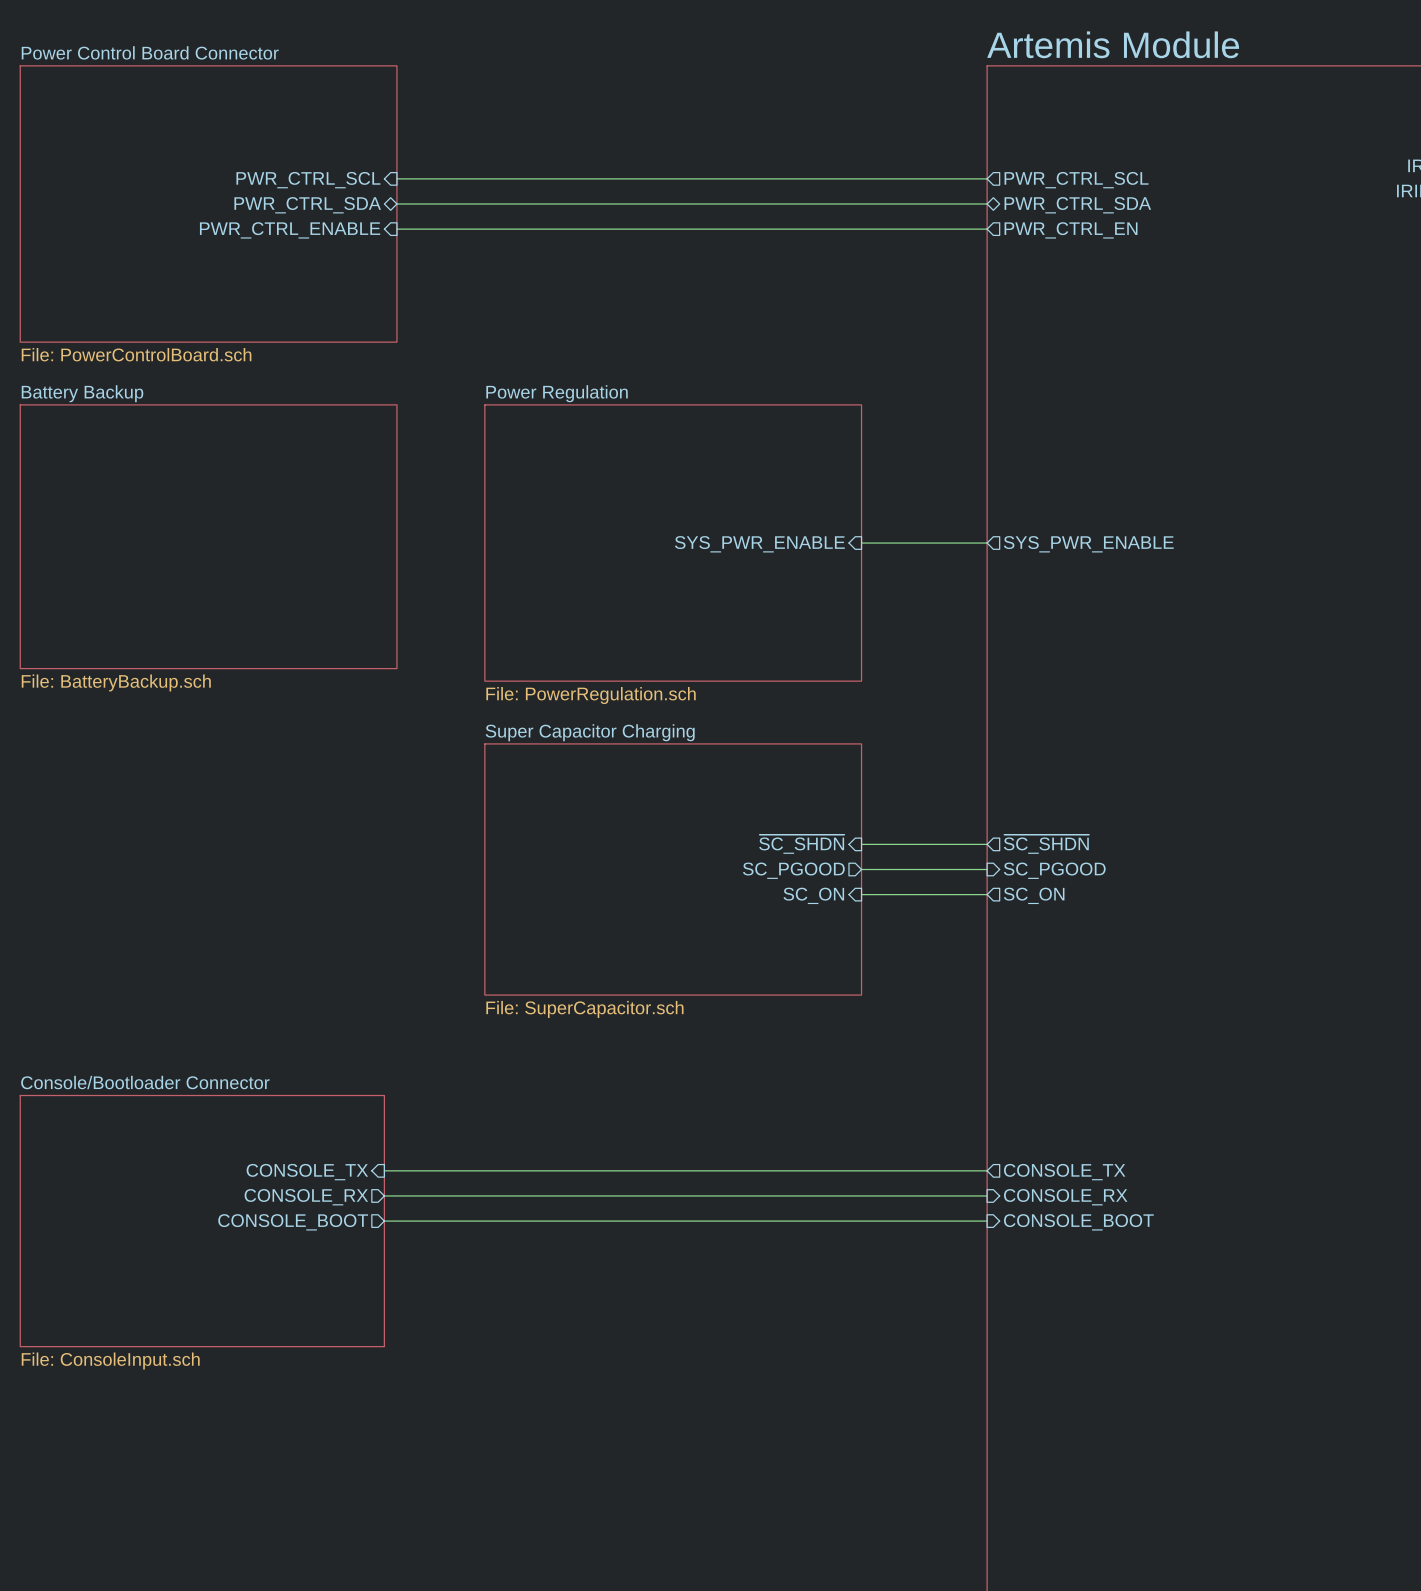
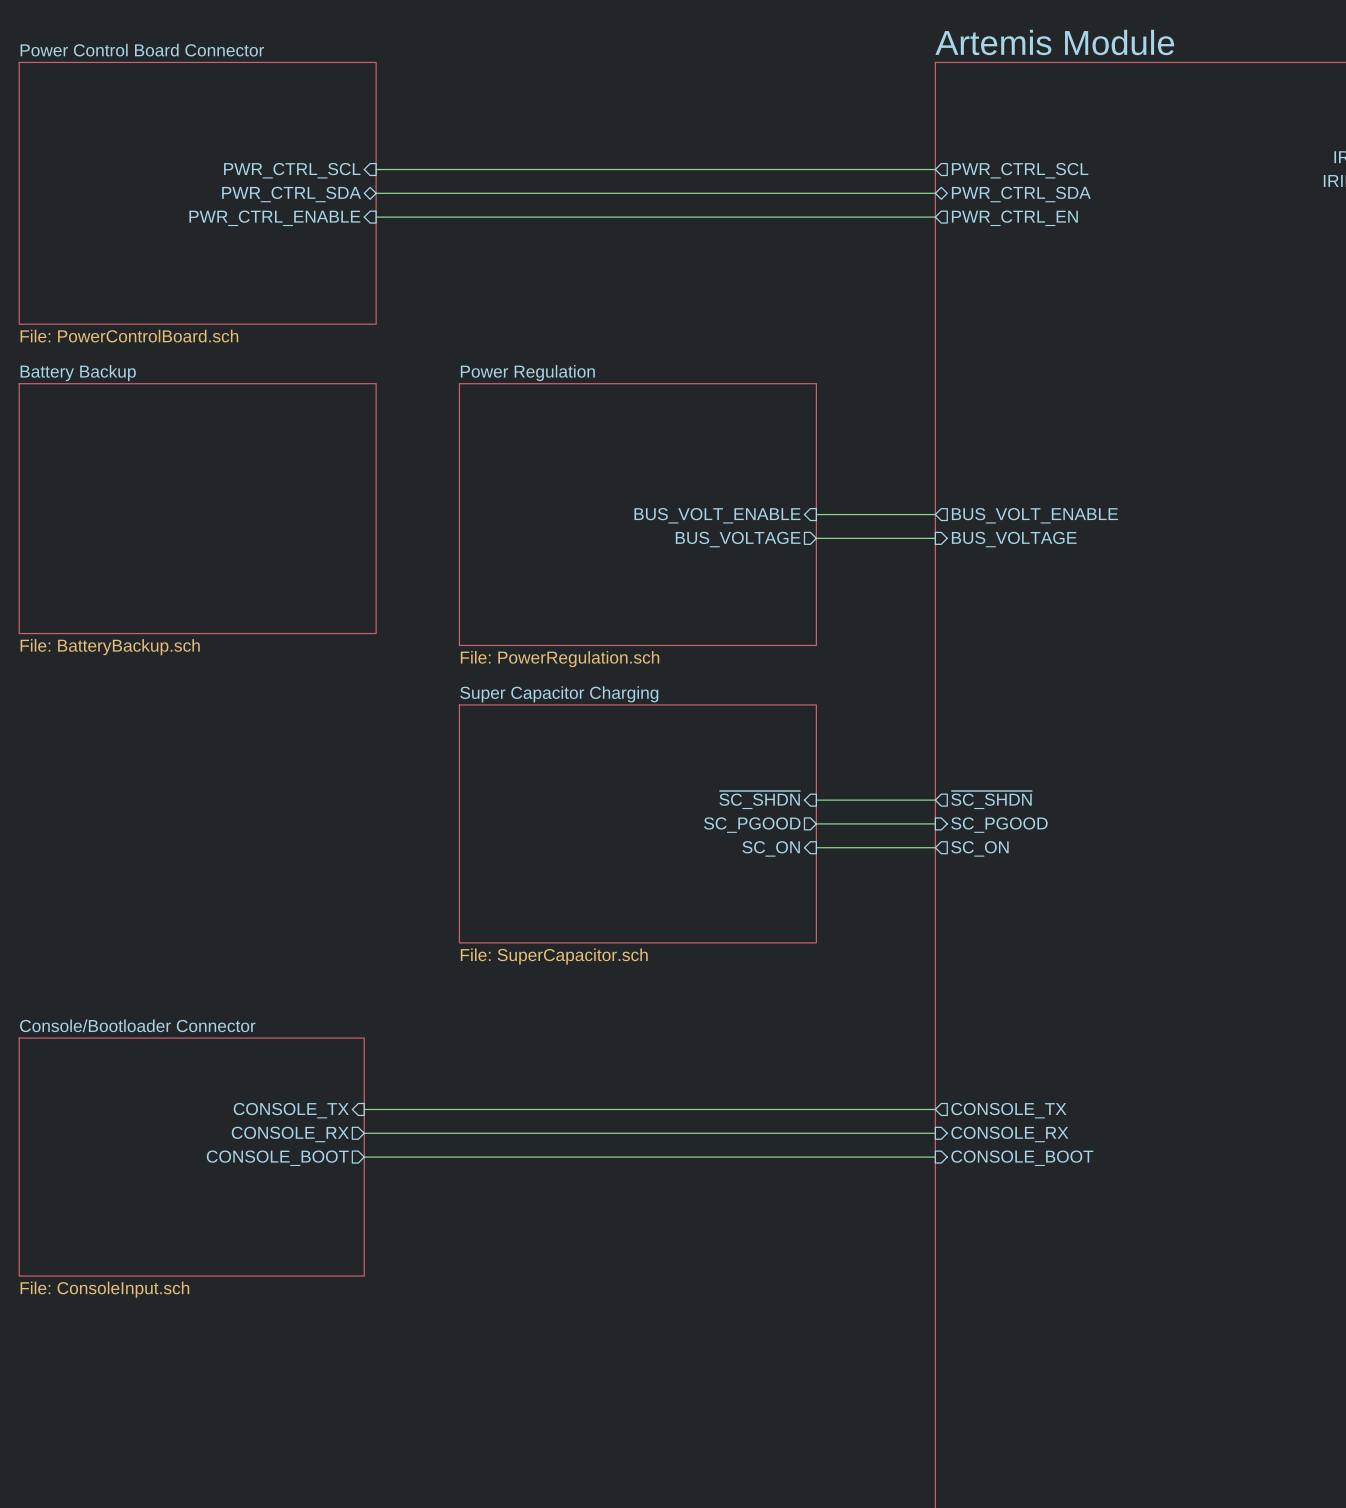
sheet pin: SYS_PWR_ENABLE (759, 544) -> BUS_VOLT_ENABLE (717, 515)
sheet pin: SYS_PWR_ENABLE (1088, 544) -> BUS_VOLT_ENABLE (1034, 515)
wire: none -> (816, 538) (935, 538)
sheet pin: none -> BUS_VOLTAGE (738, 539)
sheet pin: none -> BUS_VOLTAGE (1014, 539)

